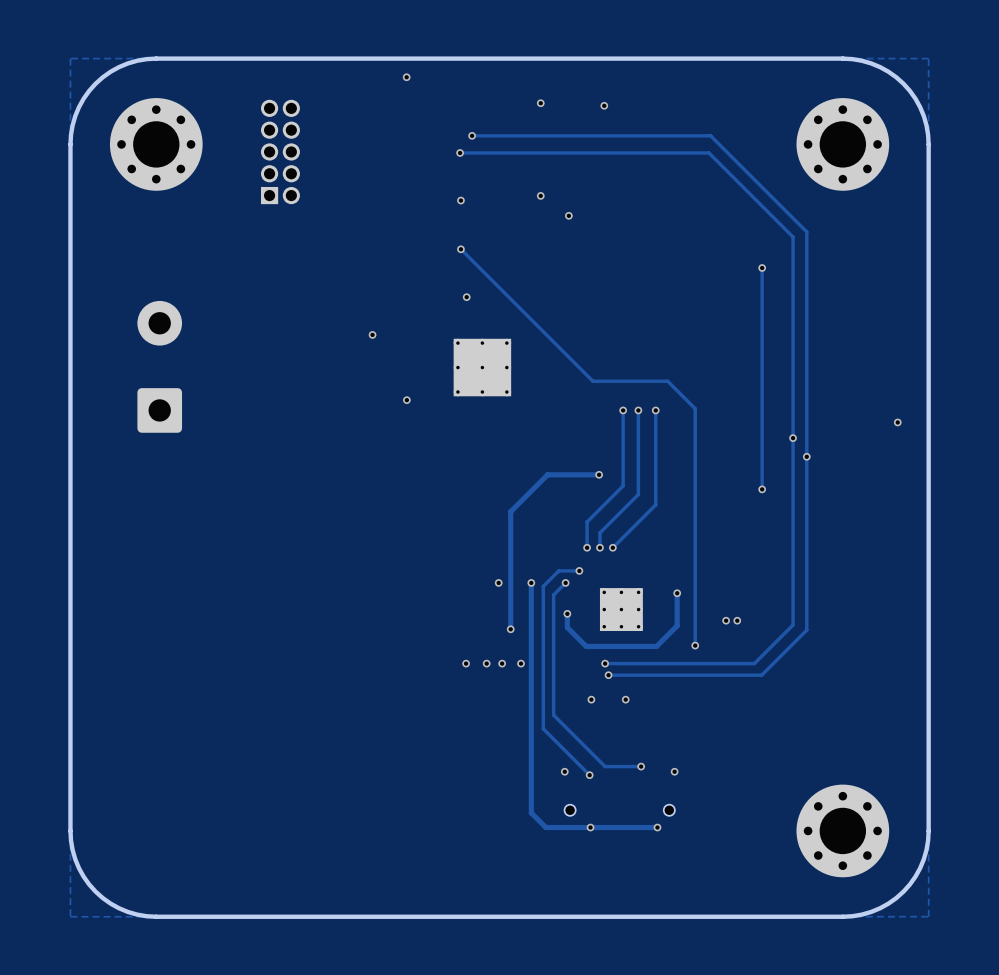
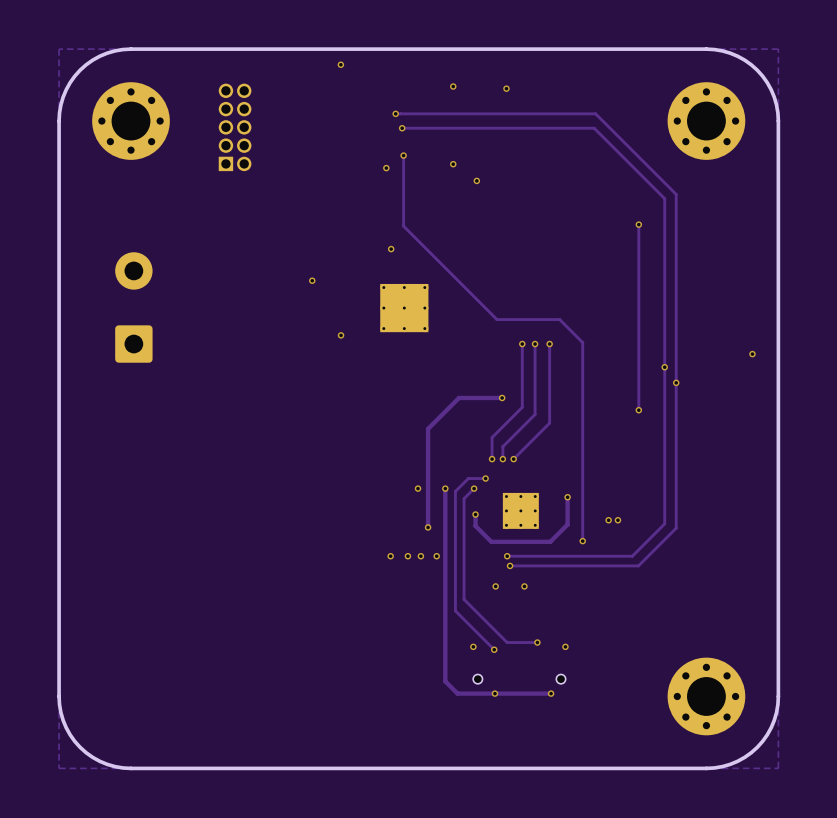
via: (460, 152) -> none
track: (479, 152) (460, 152) -> none
via: none -> (402, 128)
via: none -> (403, 155)
track: (460, 249) (481, 269) -> (403, 155) (403, 226)
via: (460, 249) -> none

